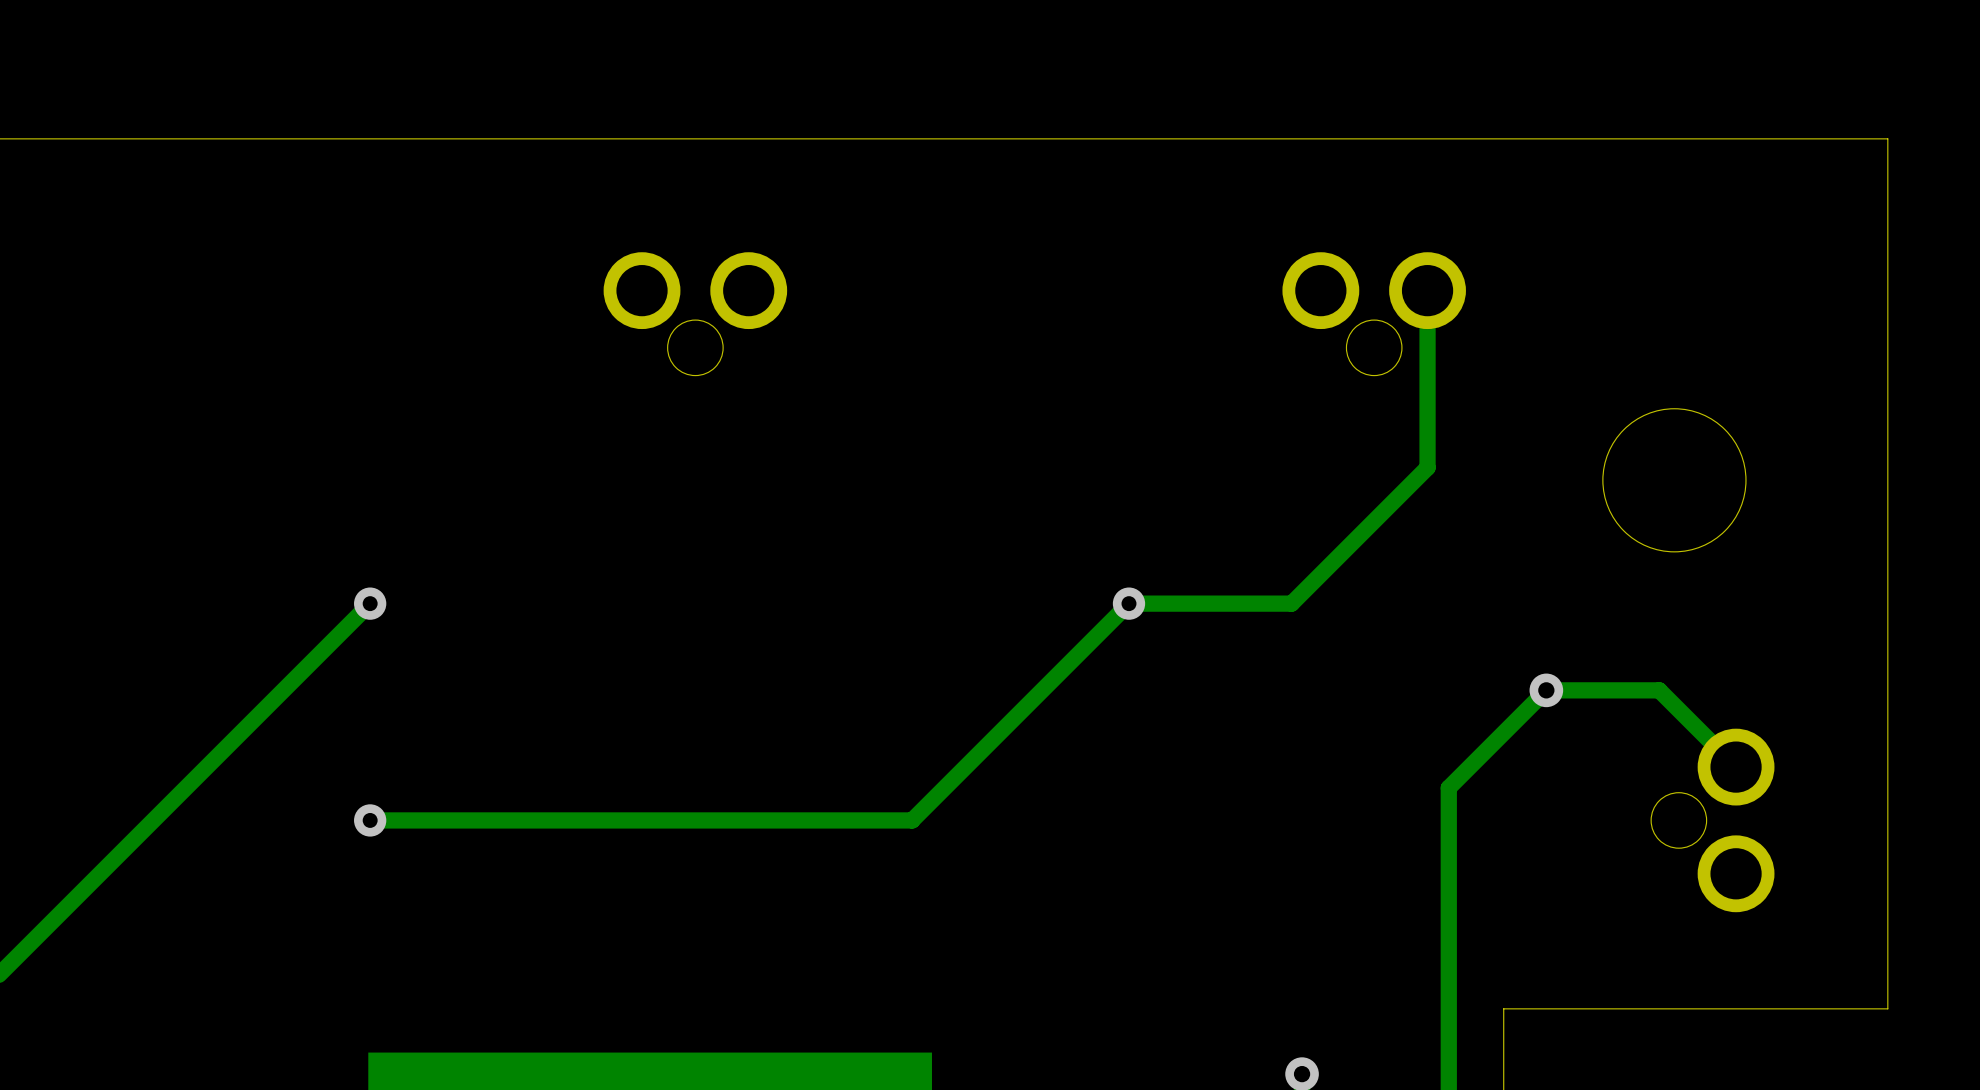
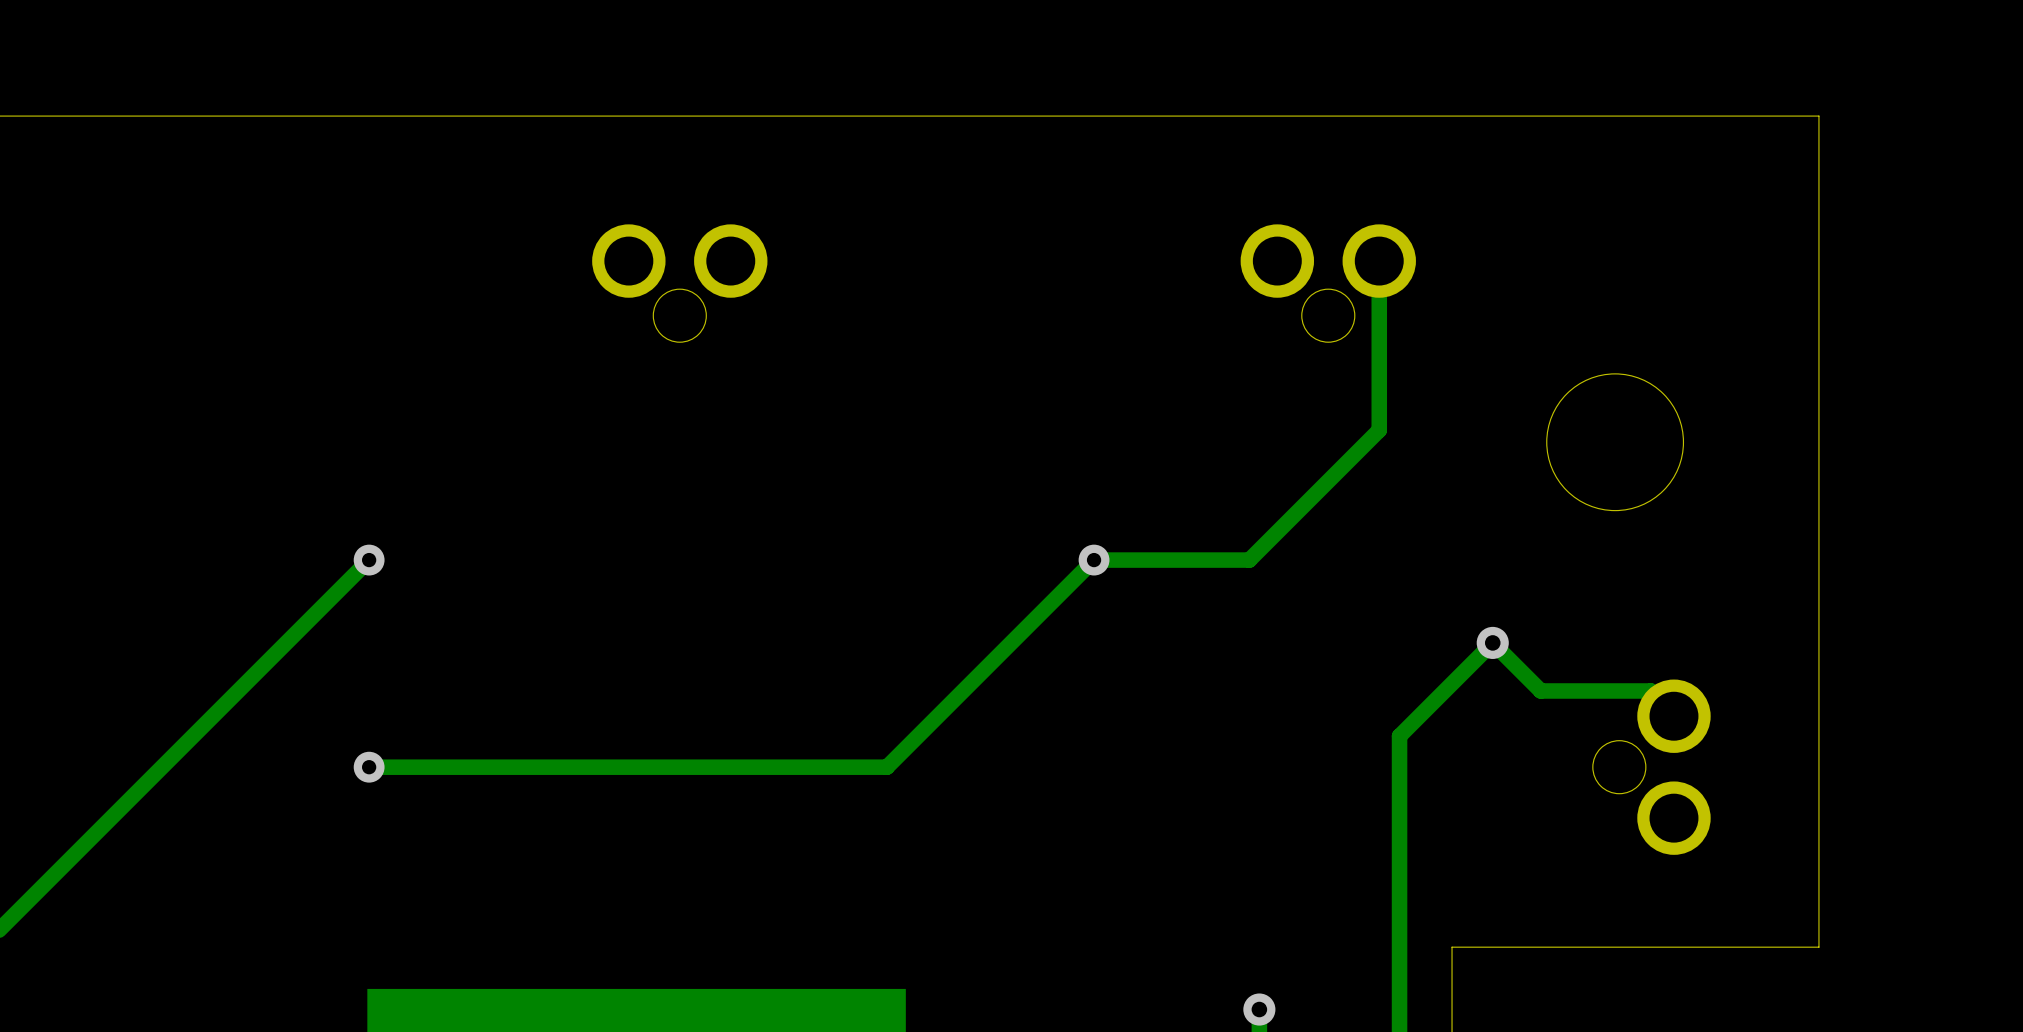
track: (1546, 690) (1659, 690) (1736, 767) -> (1492, 642) (1540, 690) (1650, 690) (1675, 715) (1673, 716)

